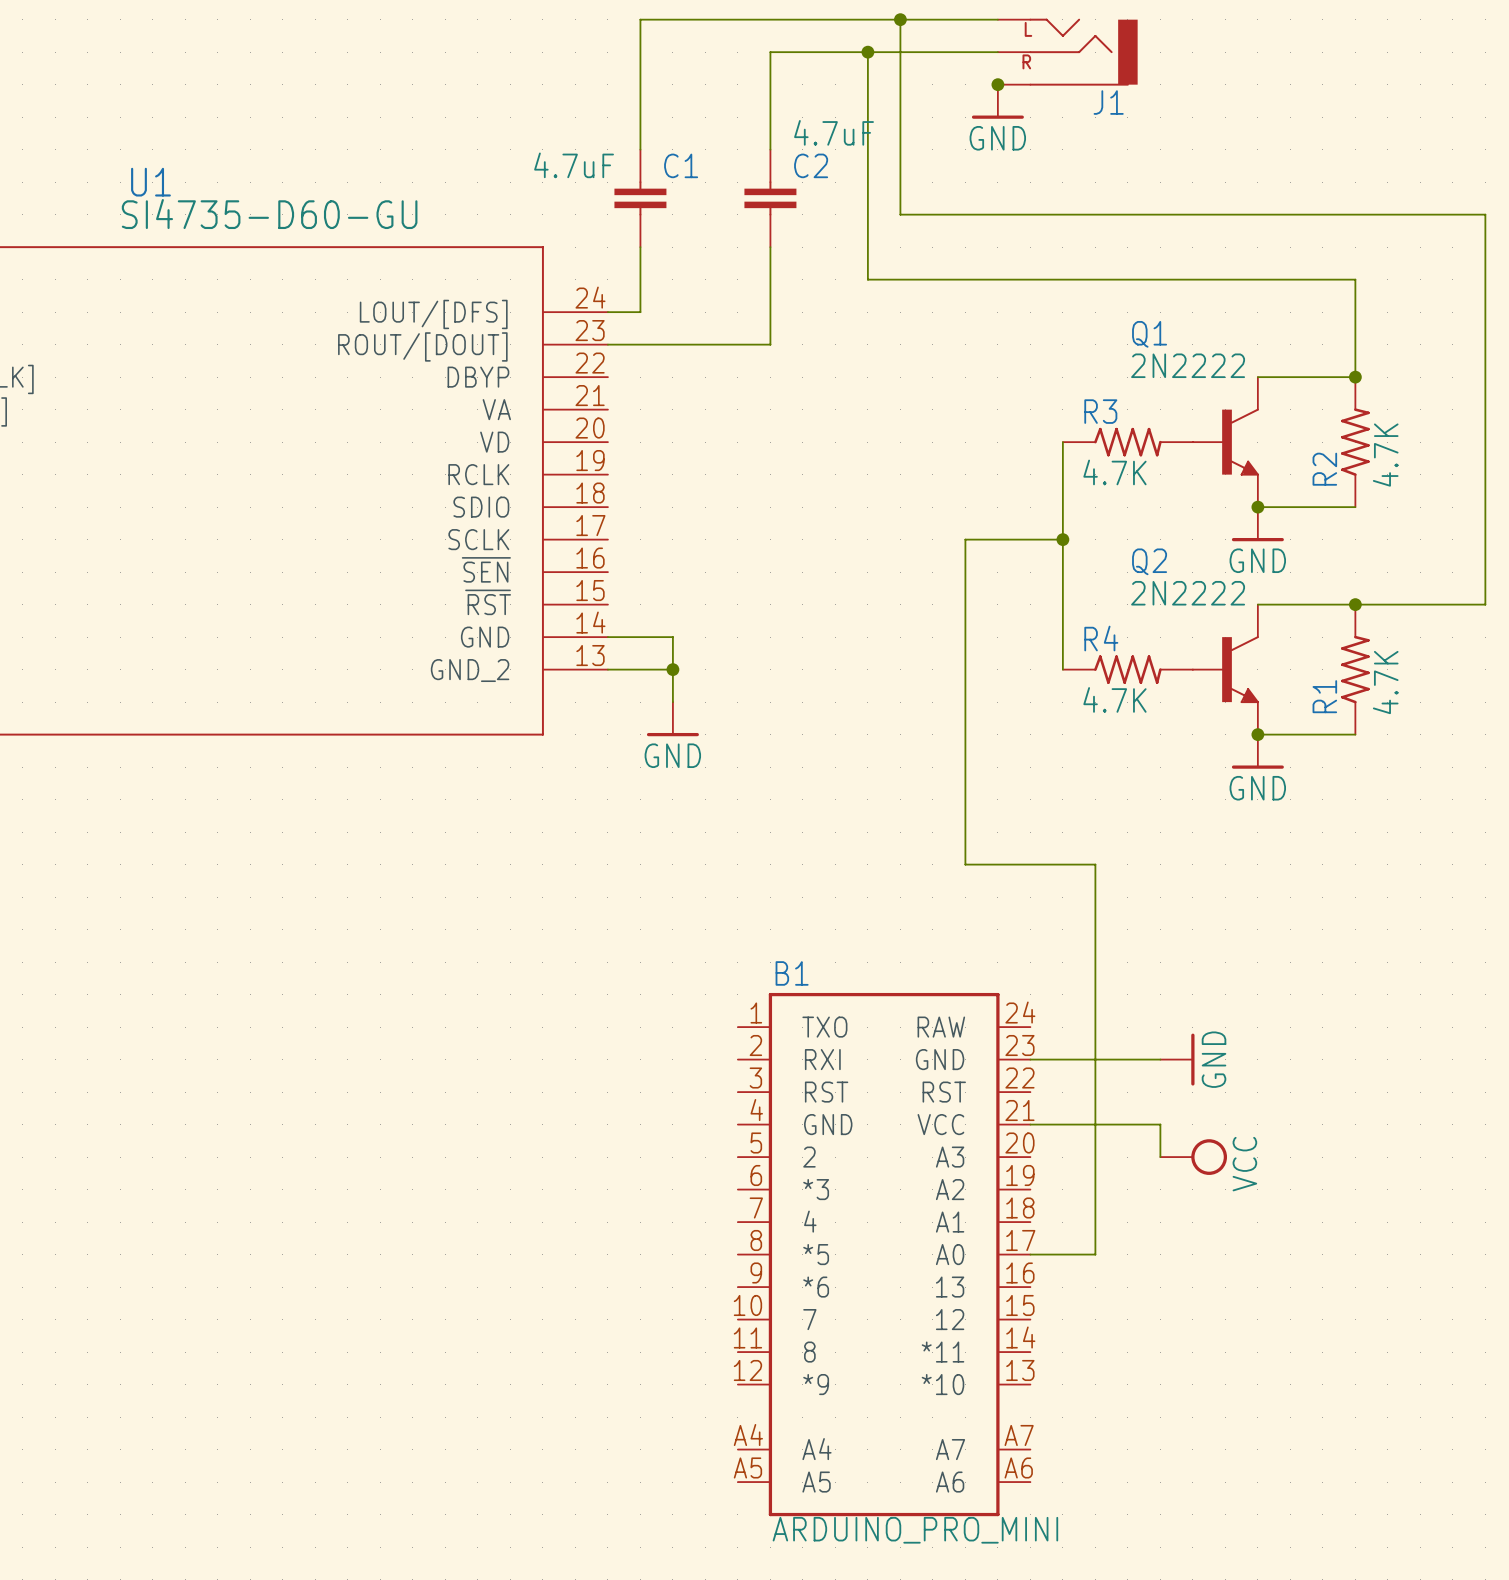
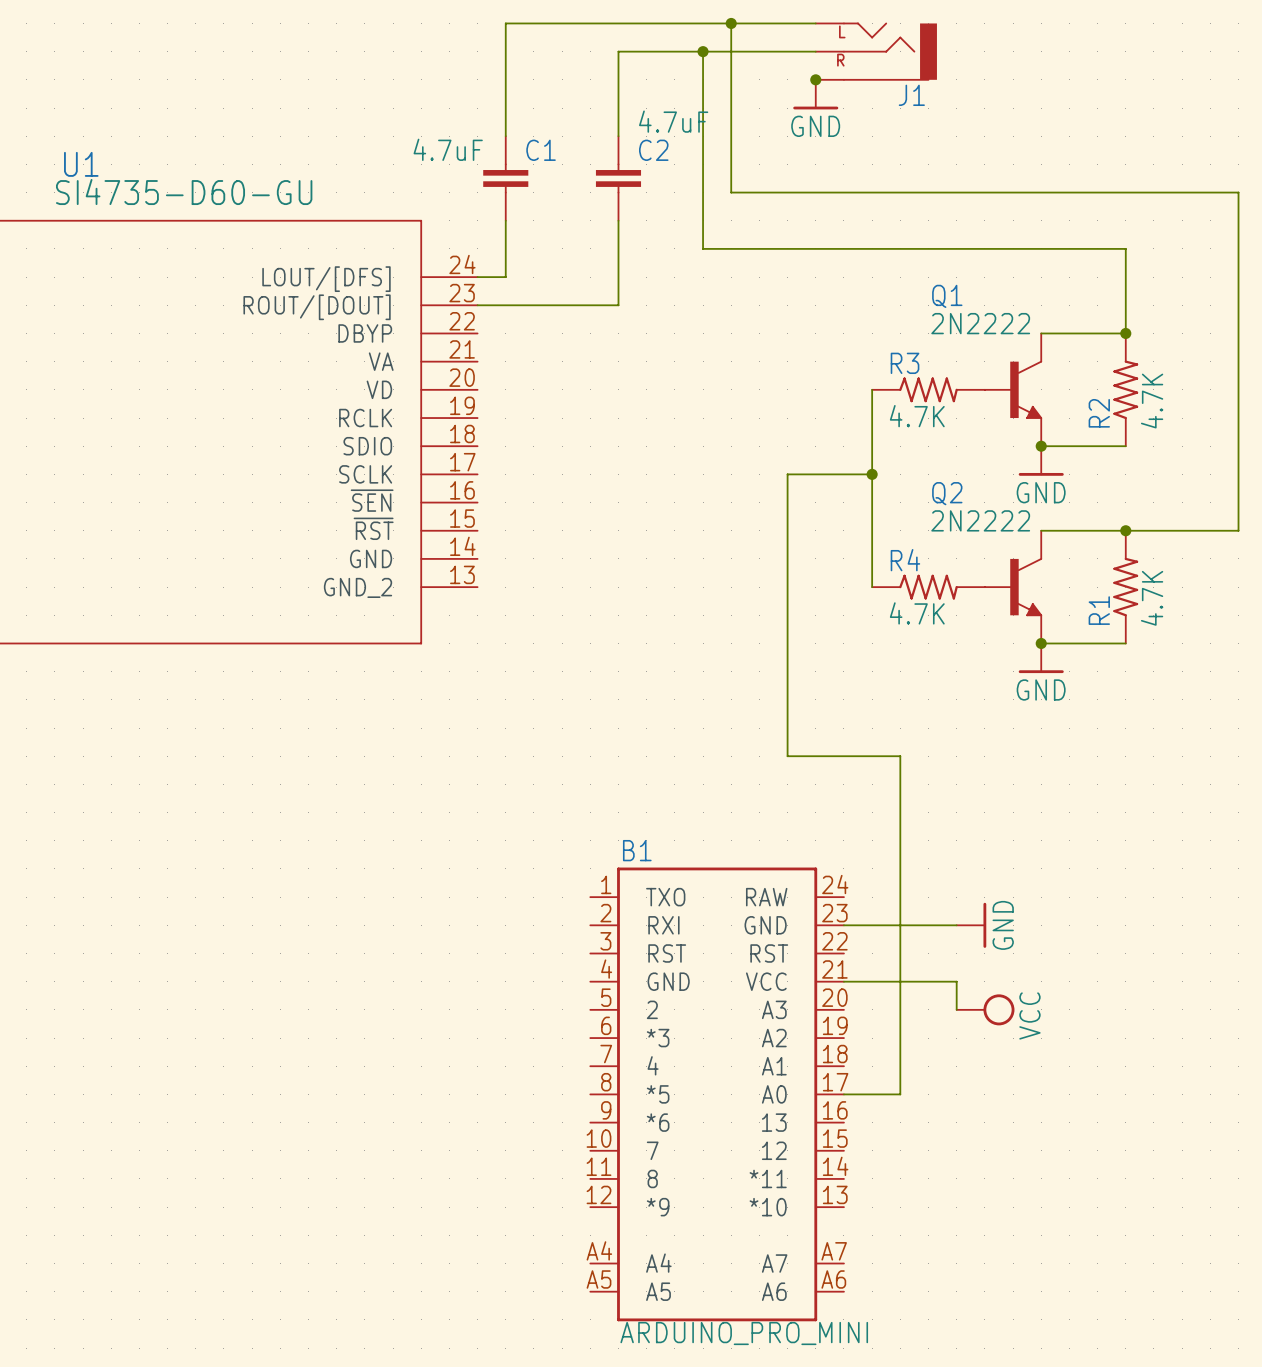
wire: (607, 637) (672, 637) (672, 702) -> none
wire: (607, 669) (672, 669) -> none
junction: (672, 669) -> none
power symbol: GND (672, 719) -> none

